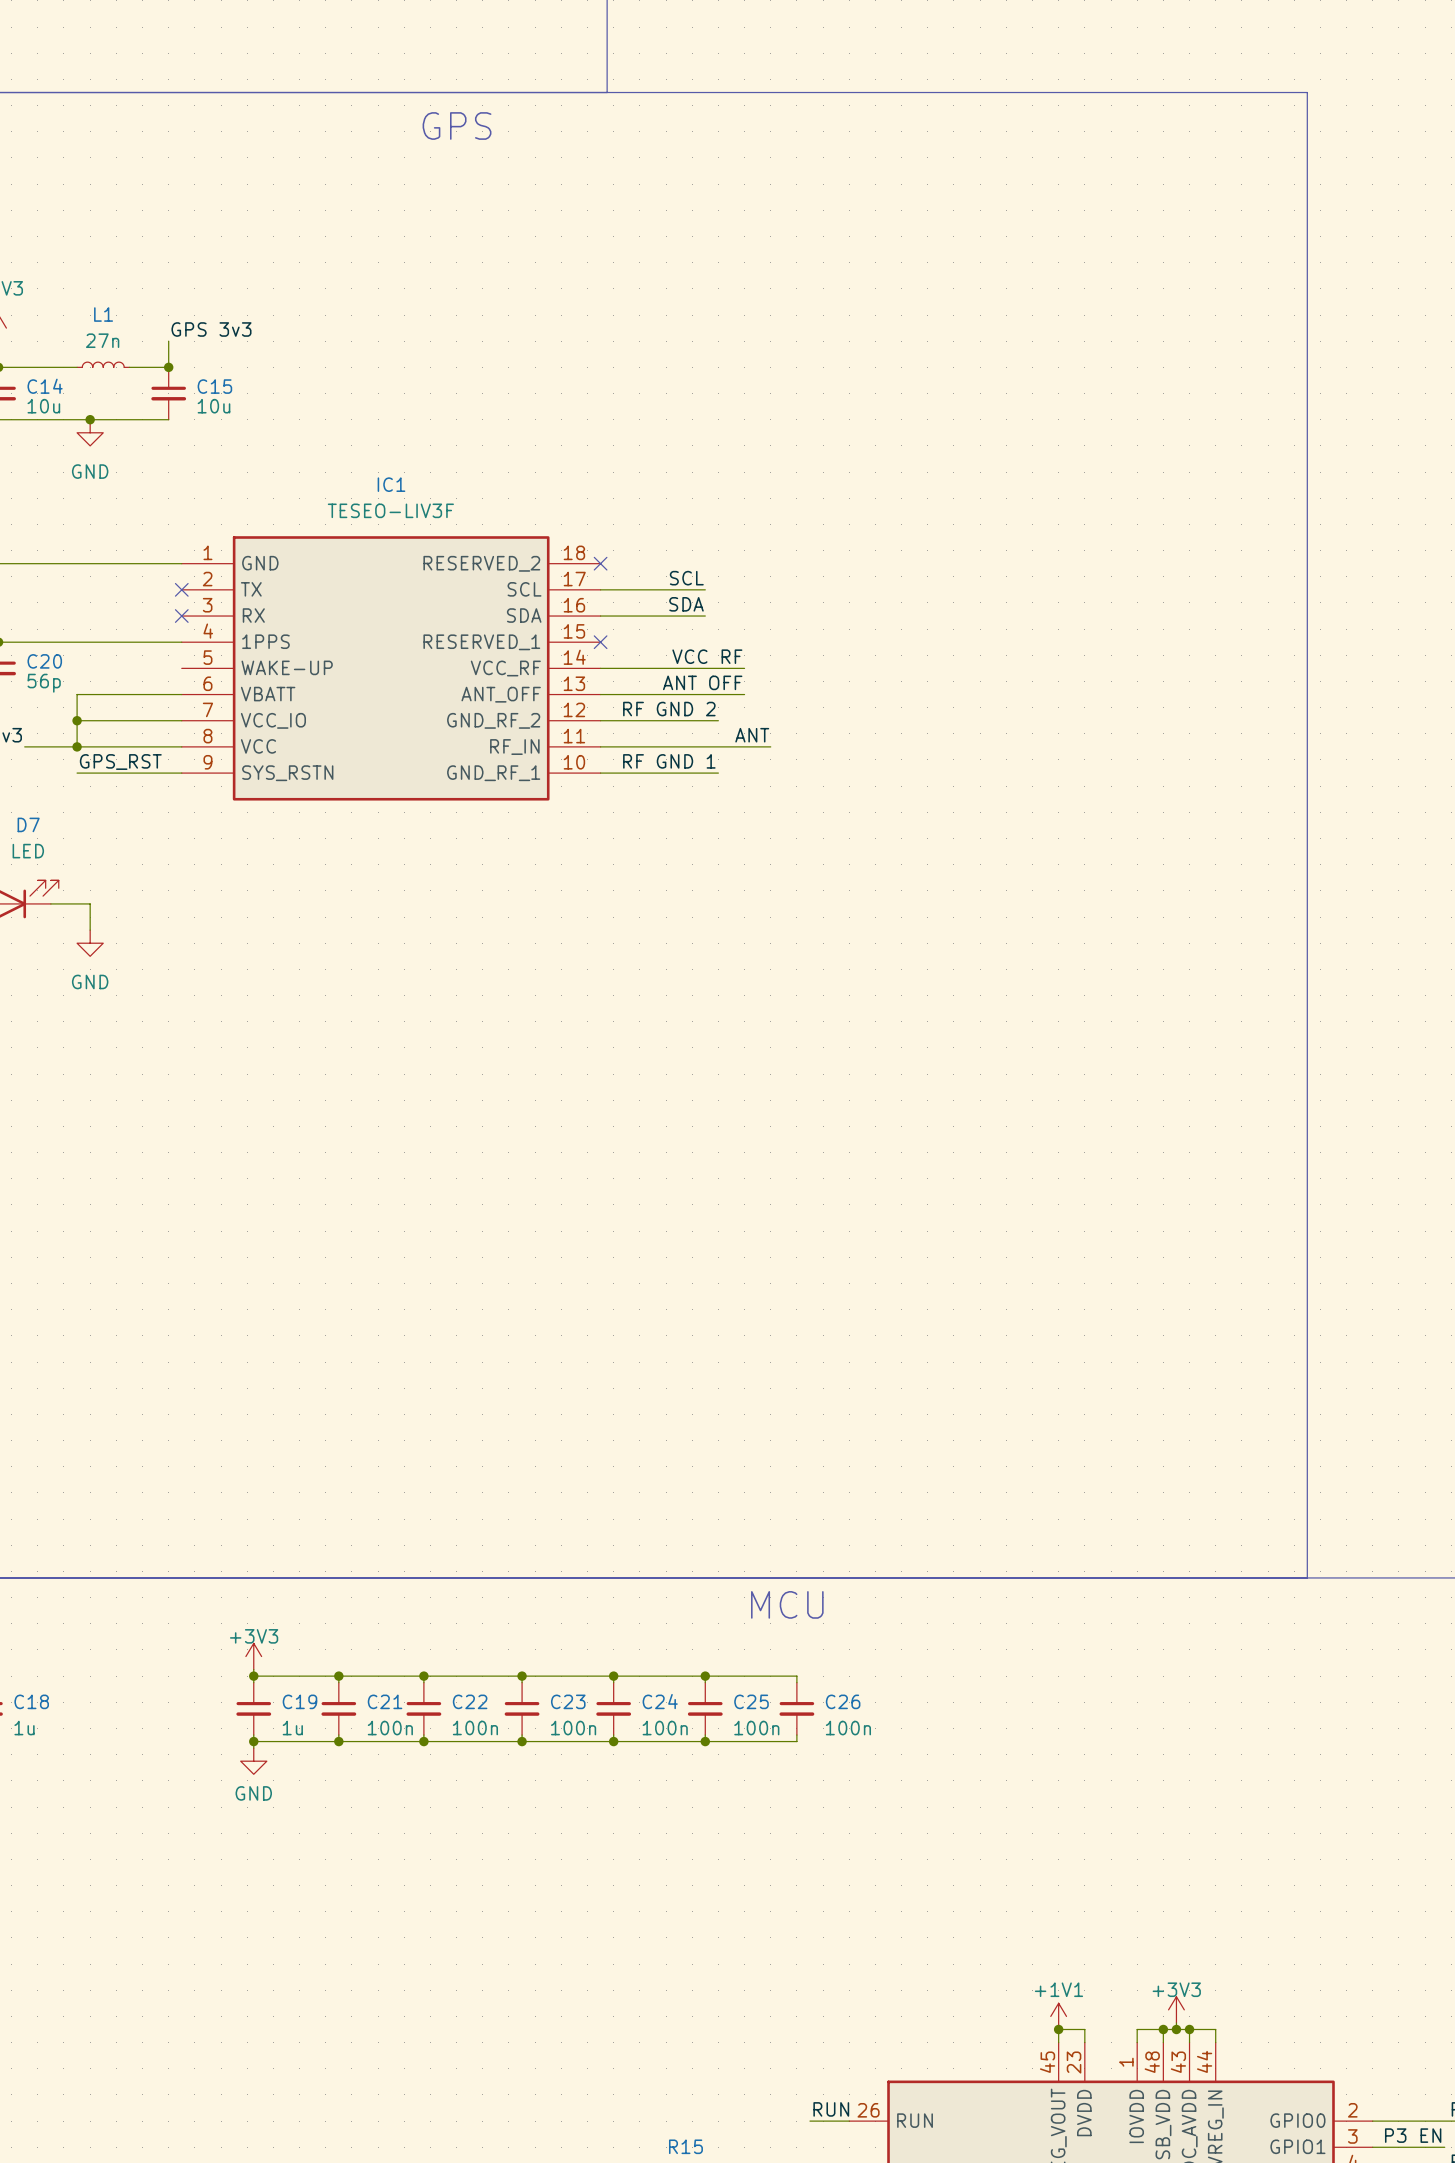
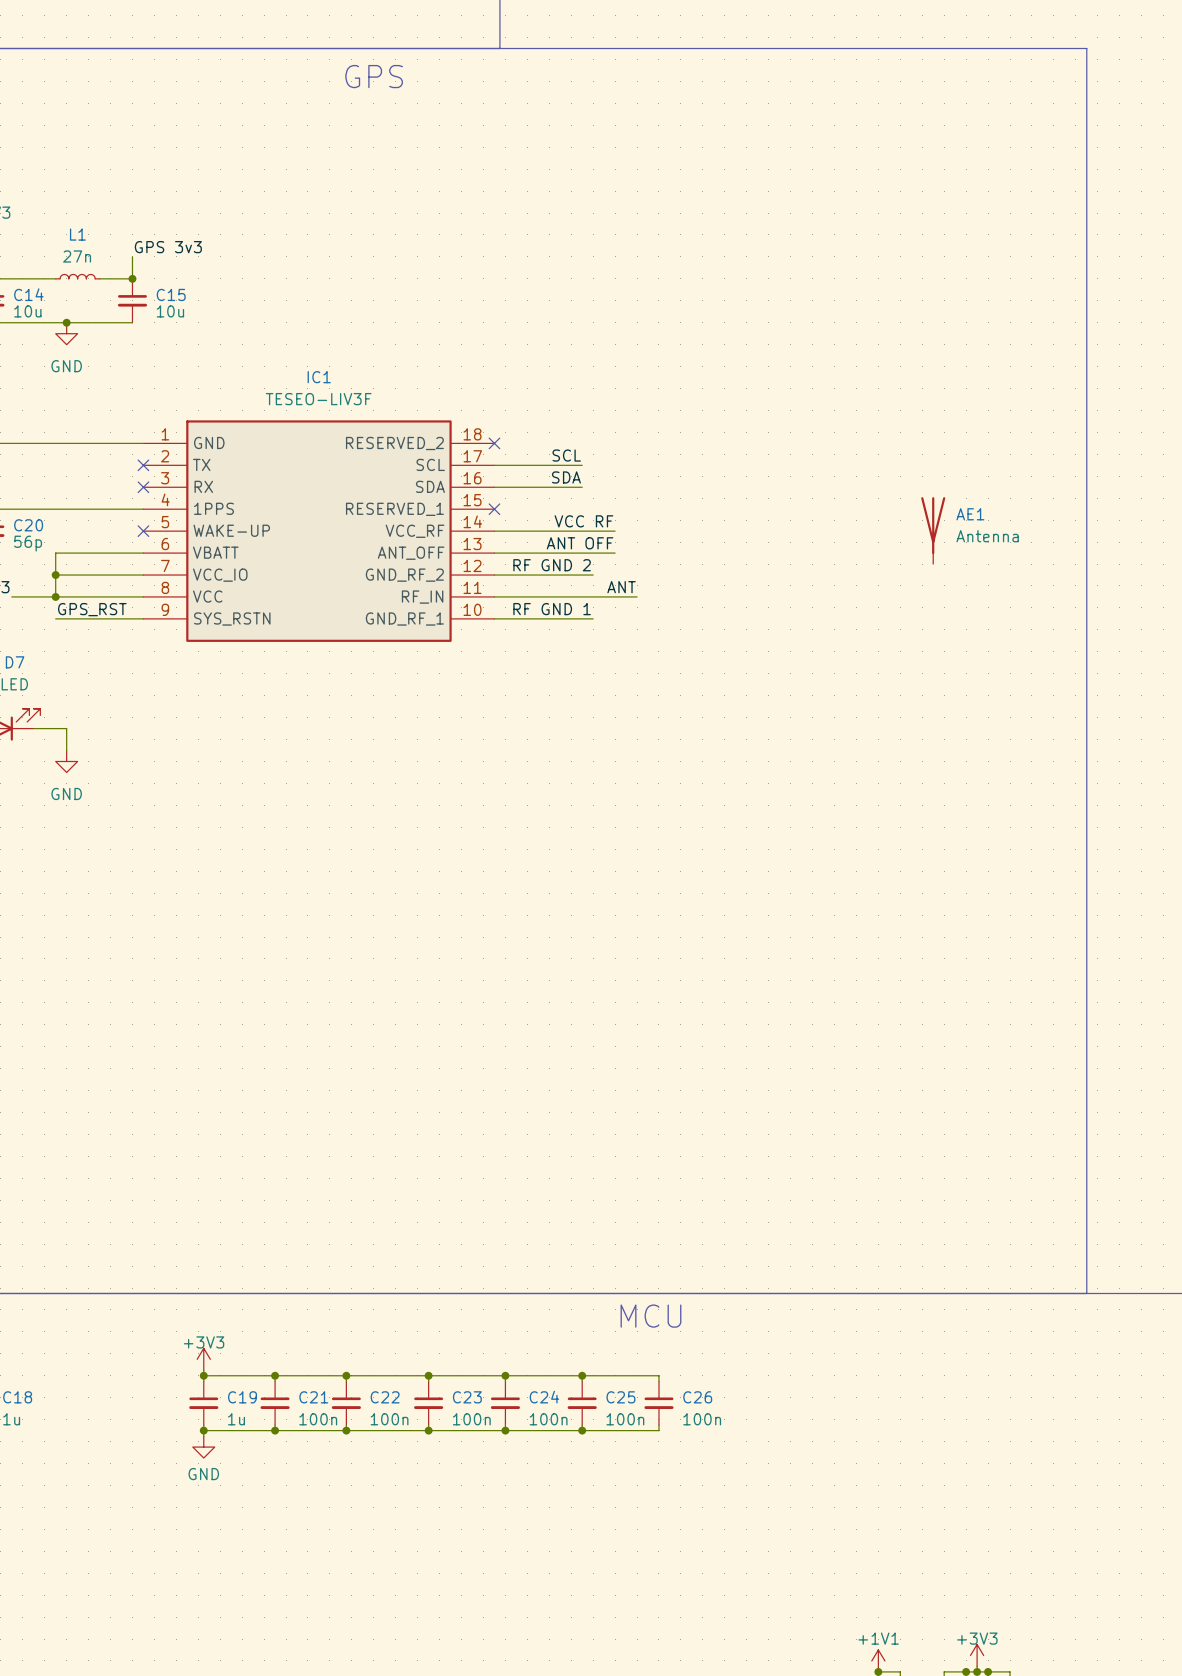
AE1: none -> Antenna (933, 530)
no-connect mark: none -> (143, 531)

